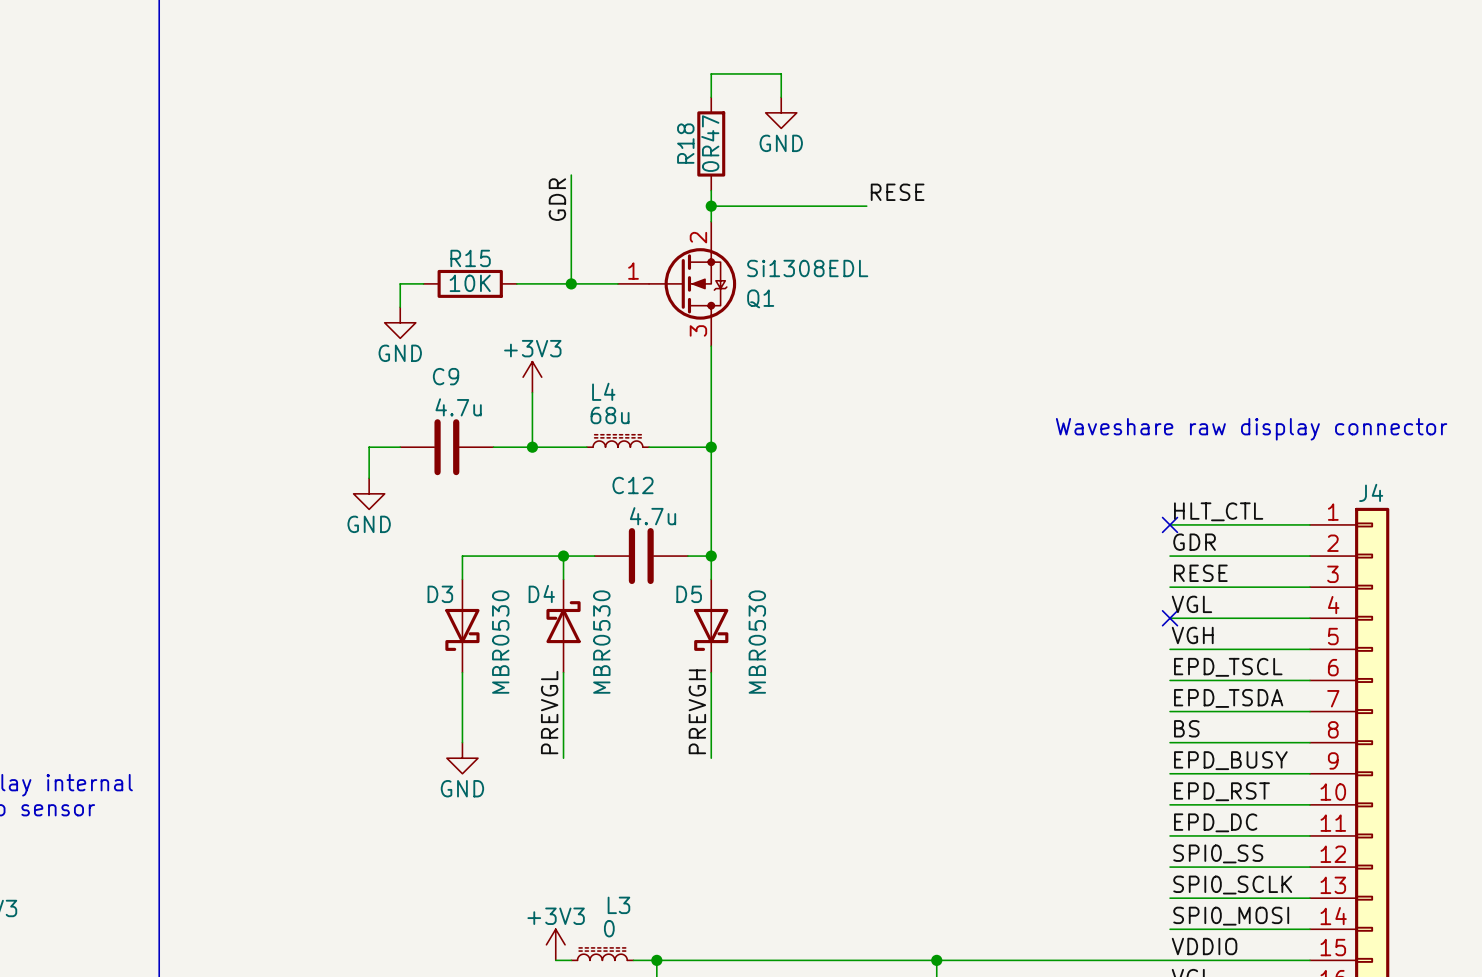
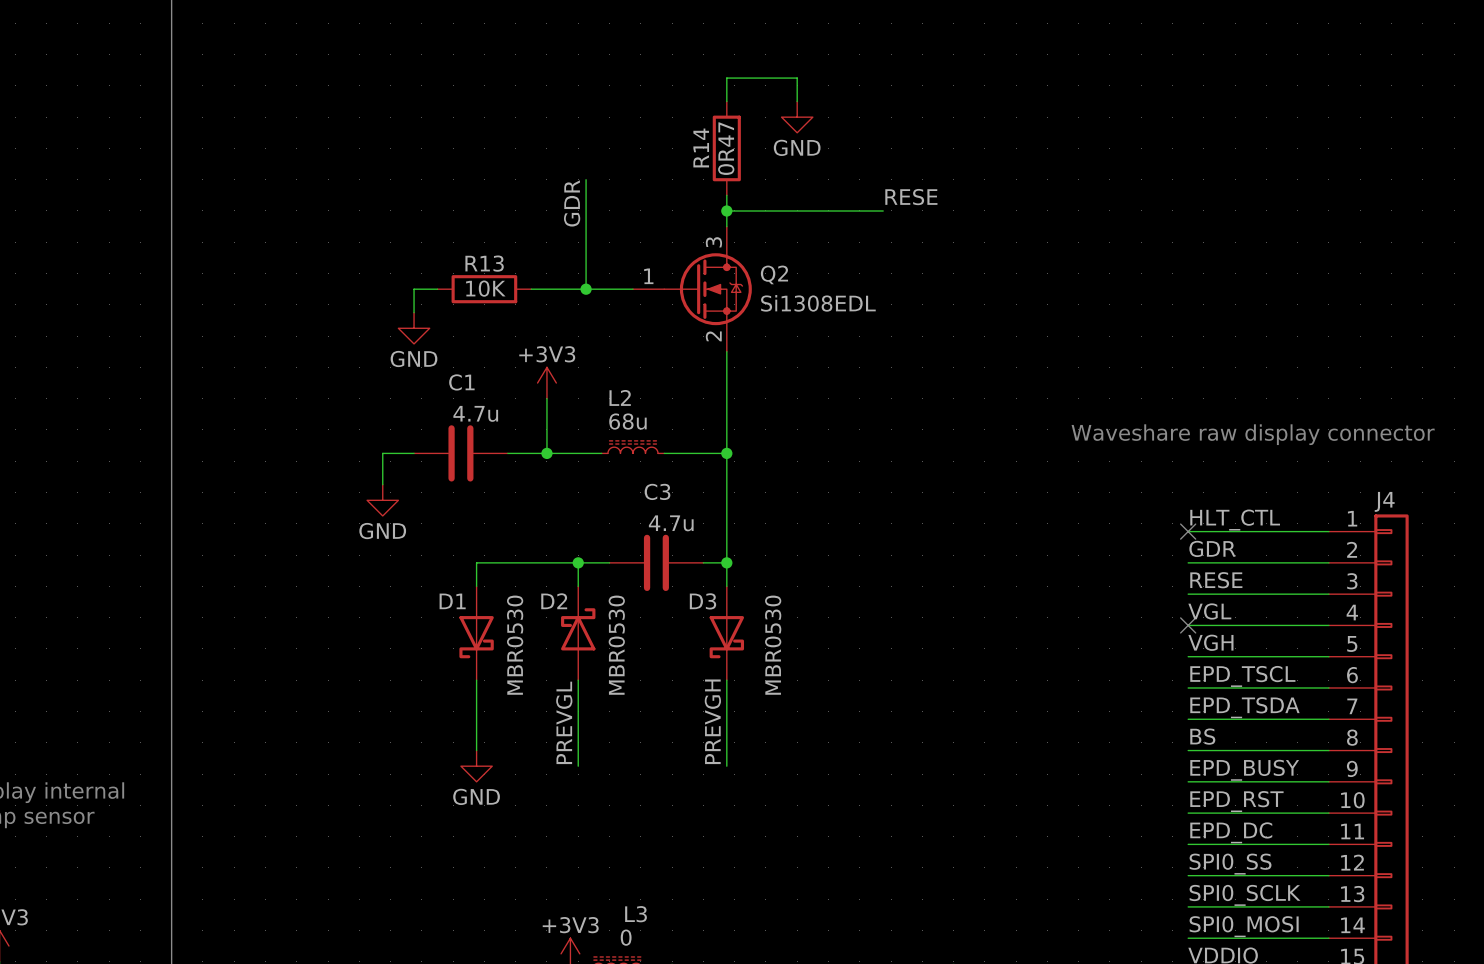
R18 name: R18 (685, 143) -> R14 (701, 147)
R15 name: R15 (470, 258) -> R13 (484, 263)
Q1: Si1308EDL (677, 283) -> none
Q2: none -> Si1308EDL (692, 289)
C9 name: C9 (446, 376) -> C1 (461, 382)
L4 name: L4 (603, 391) -> L2 (620, 397)
C12 name: C12 (633, 485) -> C3 (657, 491)
D4 name: D4 (541, 593) -> D2 (554, 601)
D3 name: D3 (440, 594) -> D1 (452, 601)
D5 name: D5 (689, 594) -> D3 (702, 601)

